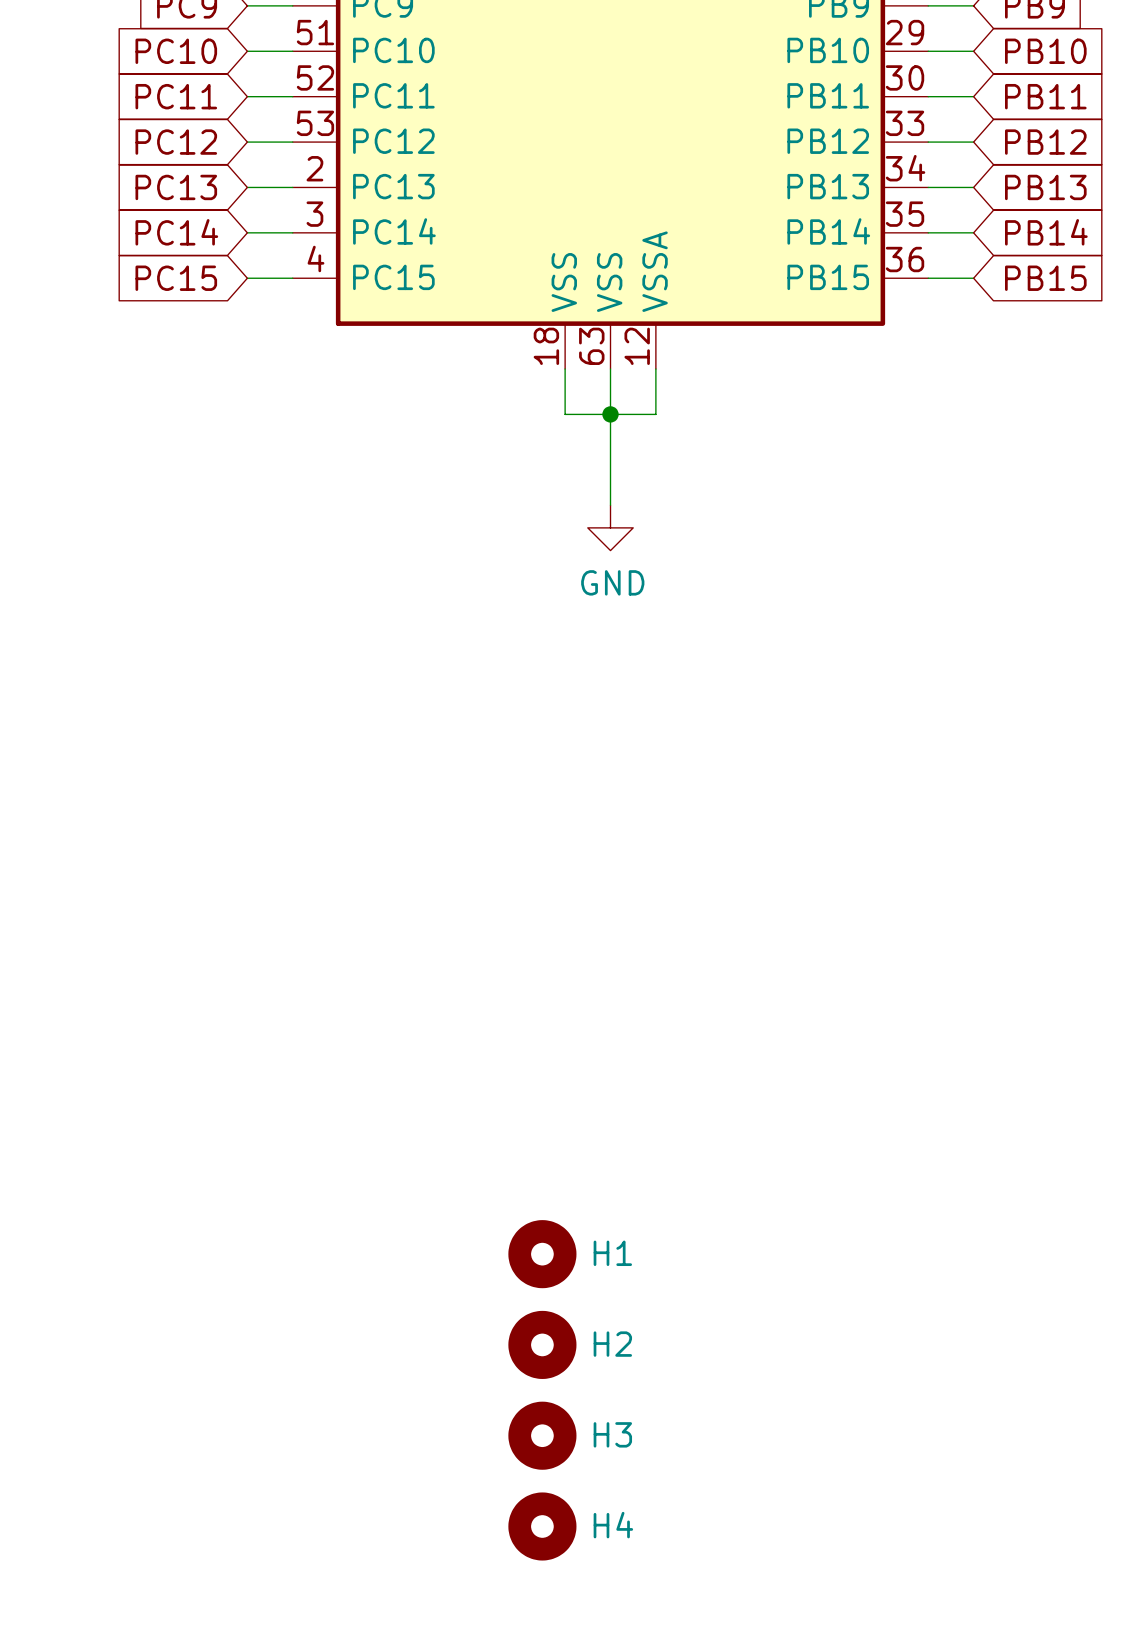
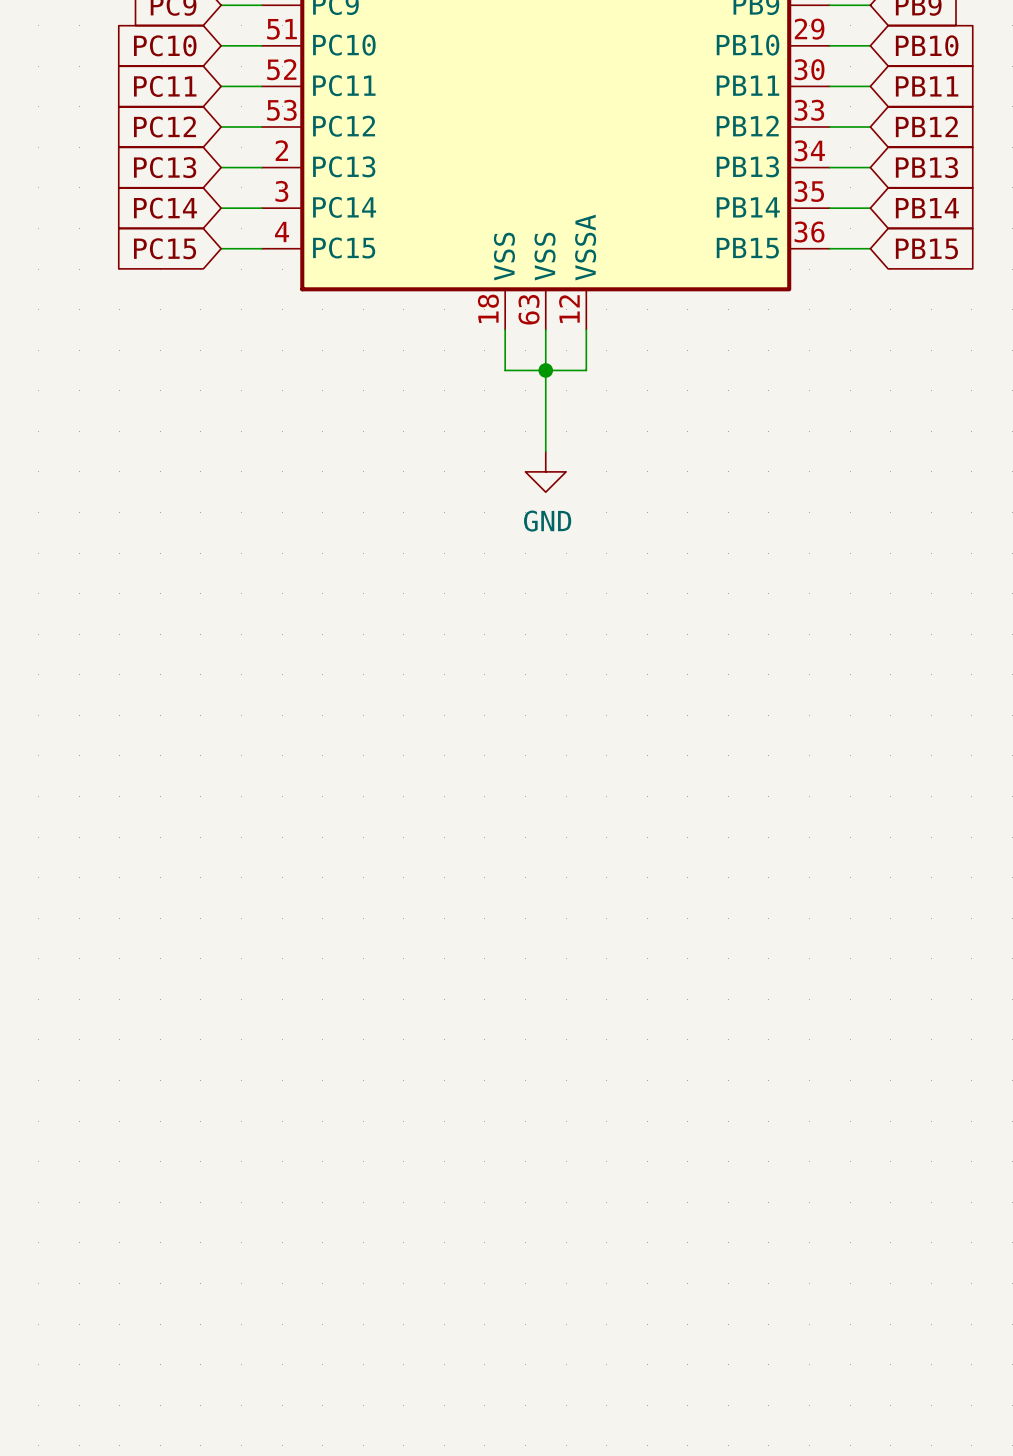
H1: (542, 1254) -> none
H2: (542, 1344) -> none
H3: (542, 1435) -> none
H4: (542, 1526) -> none

